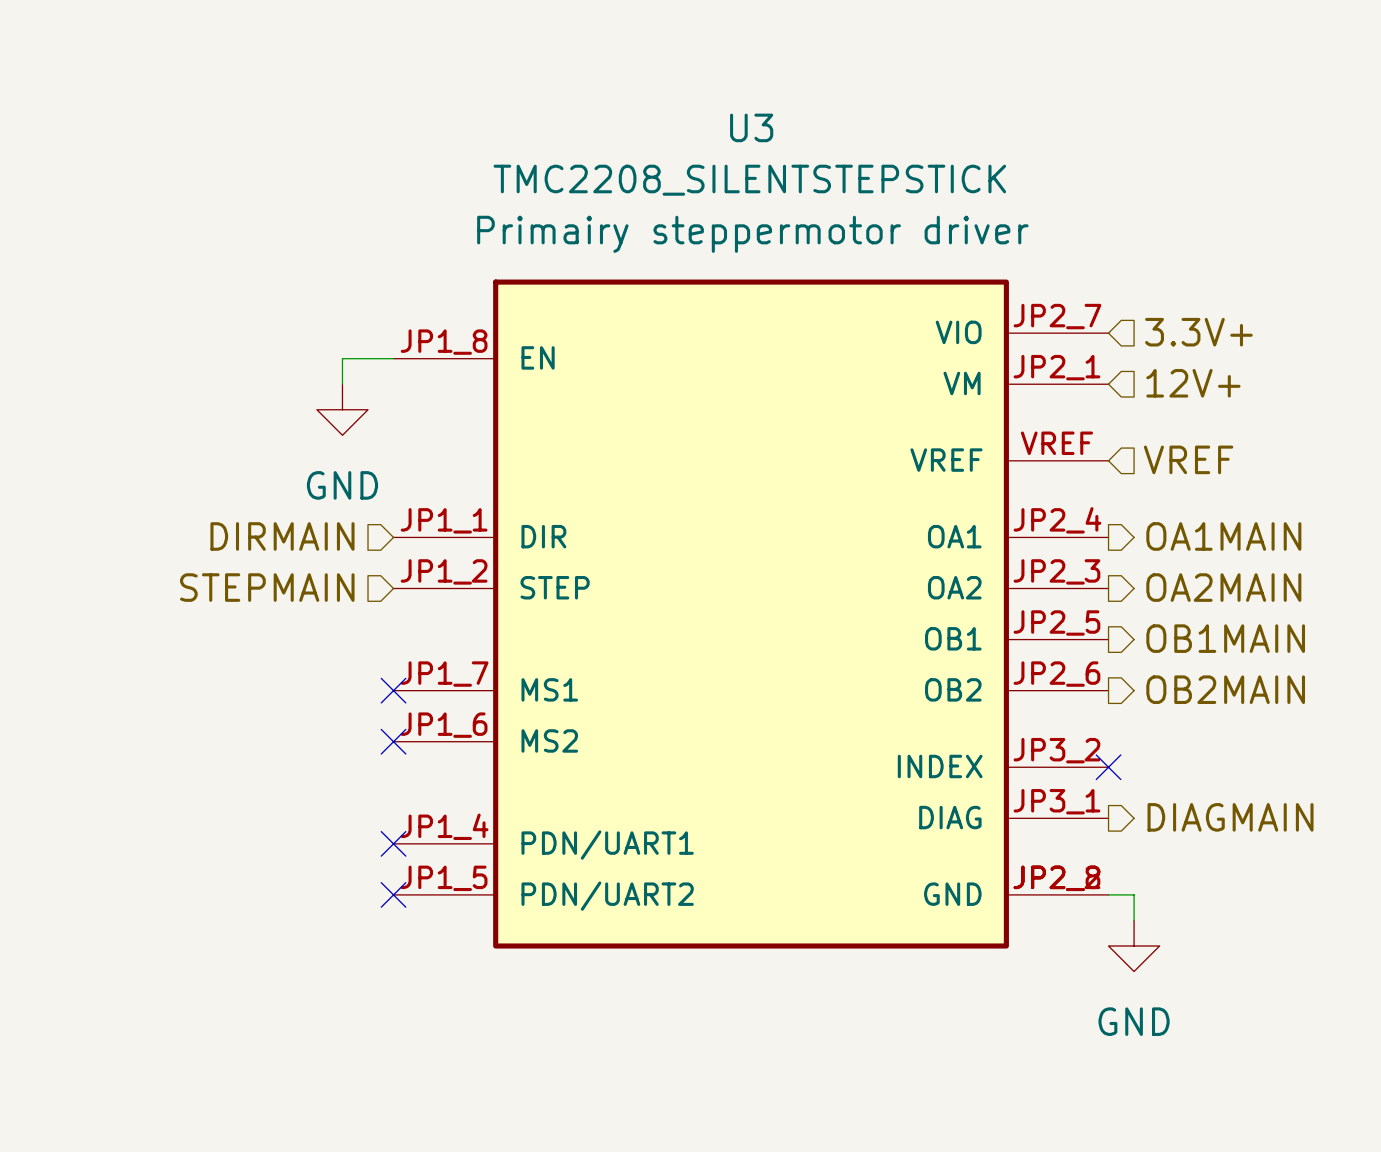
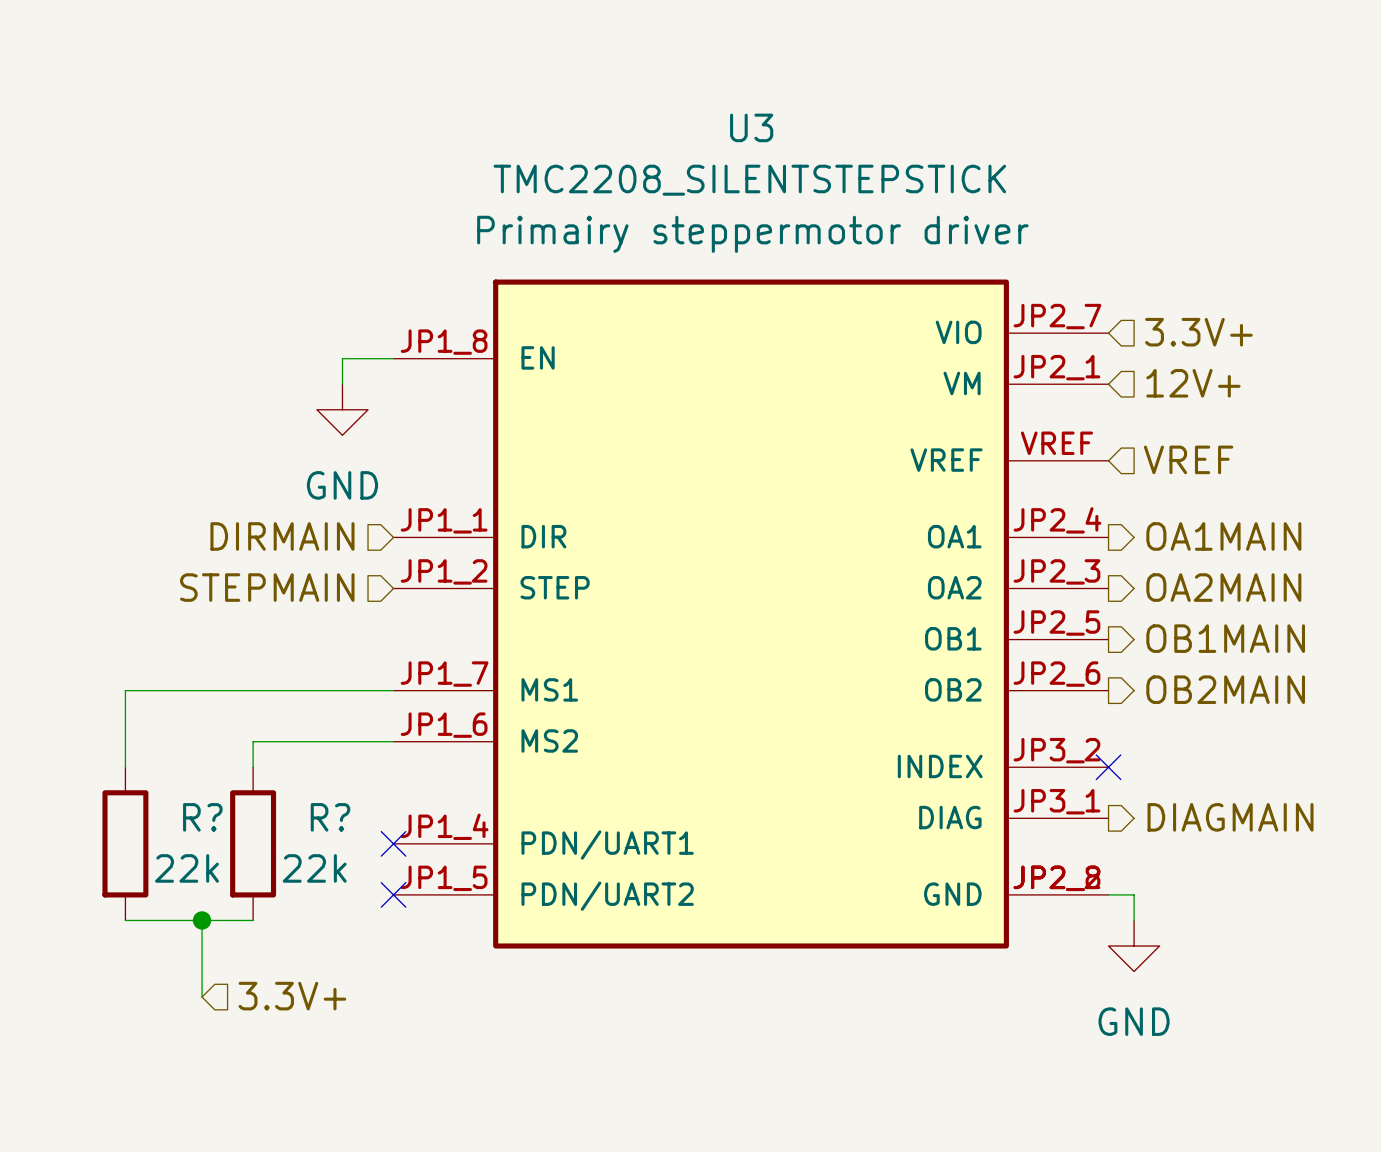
wire: none -> (393, 690) (125, 690) (125, 767)
no-connect mark: (393, 690) -> none
wire: none -> (393, 741) (253, 741) (253, 767)
no-connect mark: (393, 741) -> none
R?: none -> 22k (125, 843)
R?: none -> 22k (253, 843)
wire: none -> (125, 920) (253, 920)
wire: none -> (202, 920) (202, 997)
junction: none -> (202, 920)
hierarchical label: none -> 3.3V+ (292, 996)

